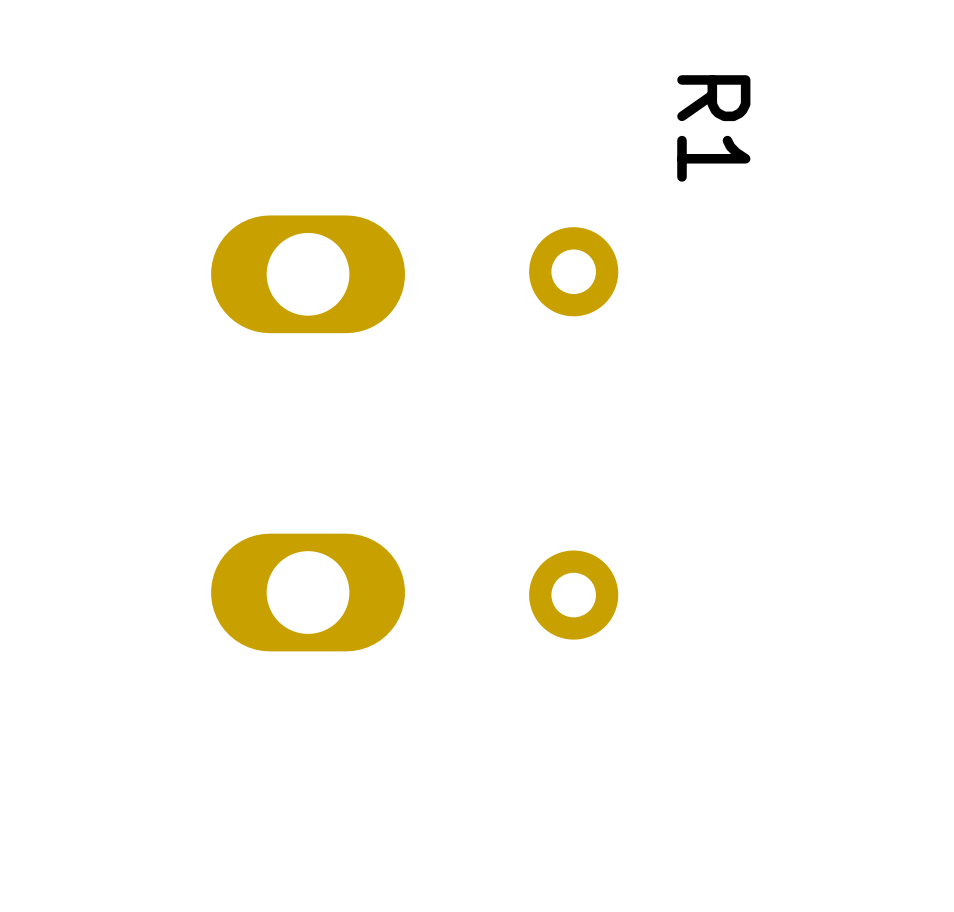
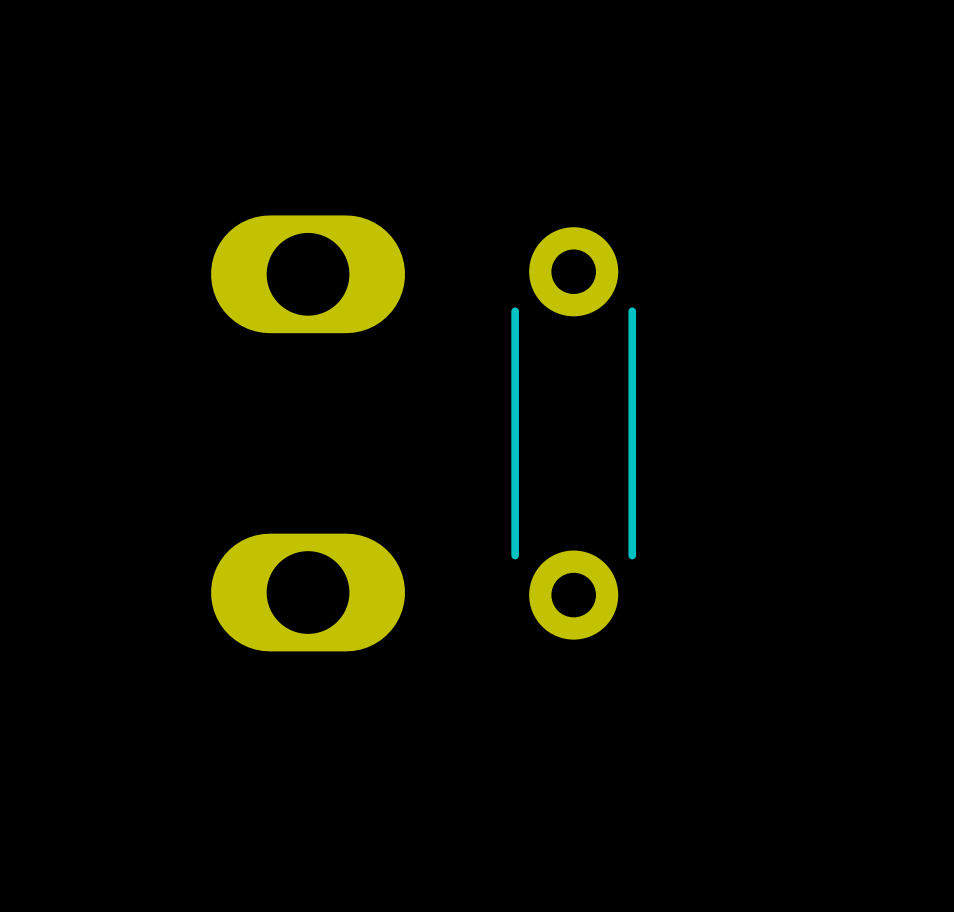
R1 side: top (573, 433) -> bottom (573, 433)

